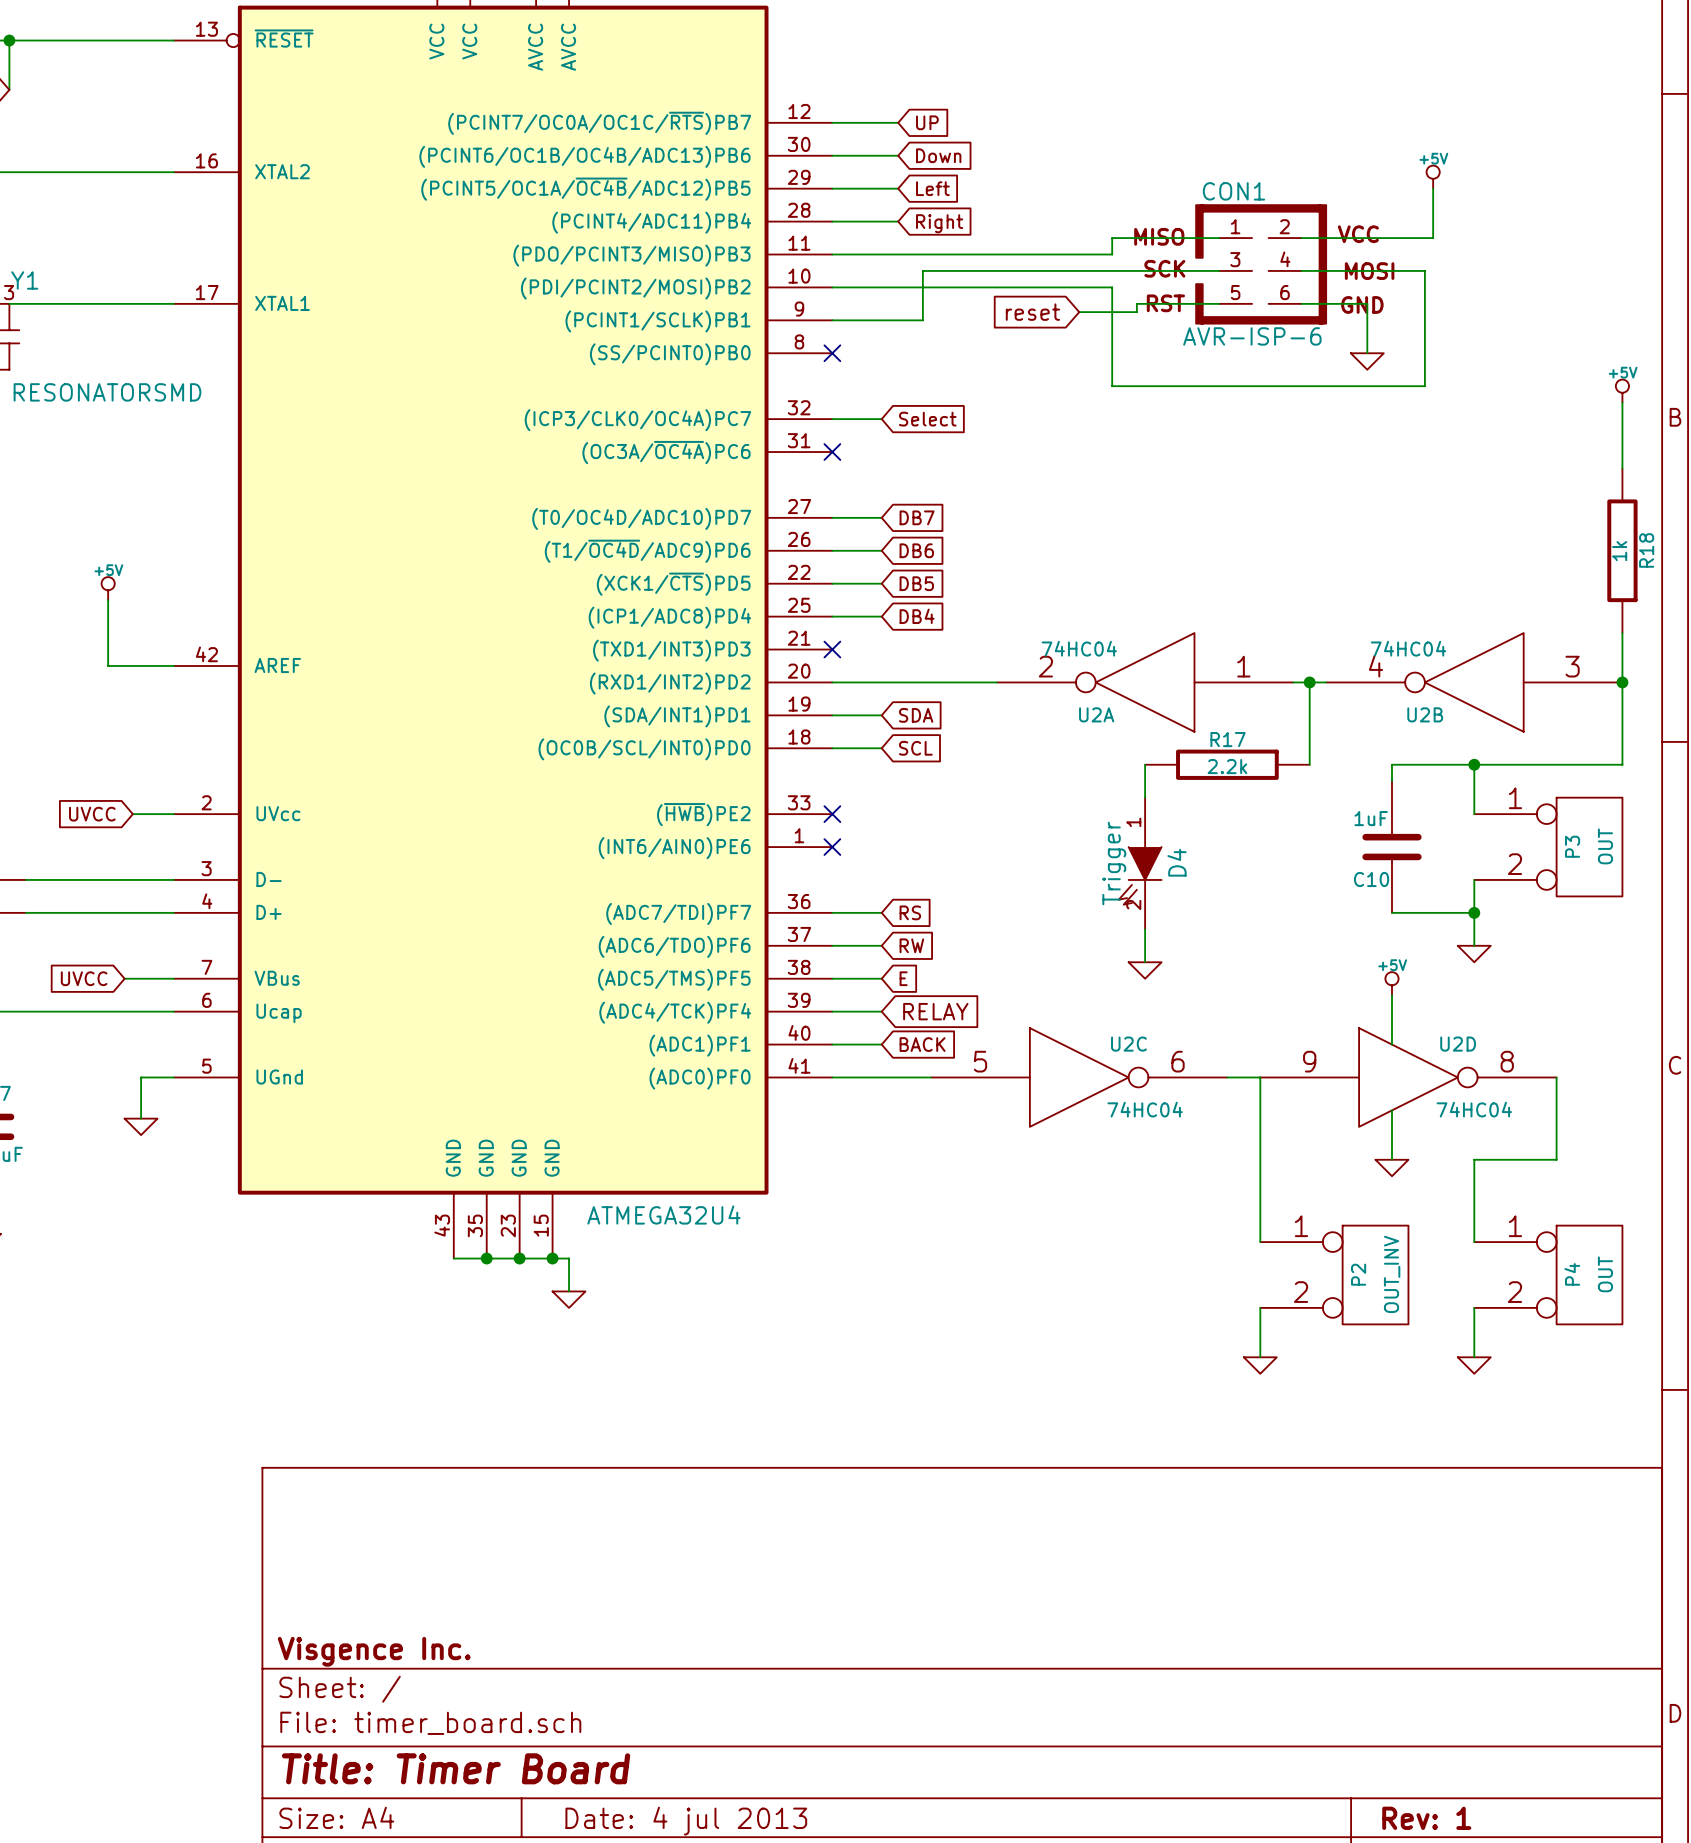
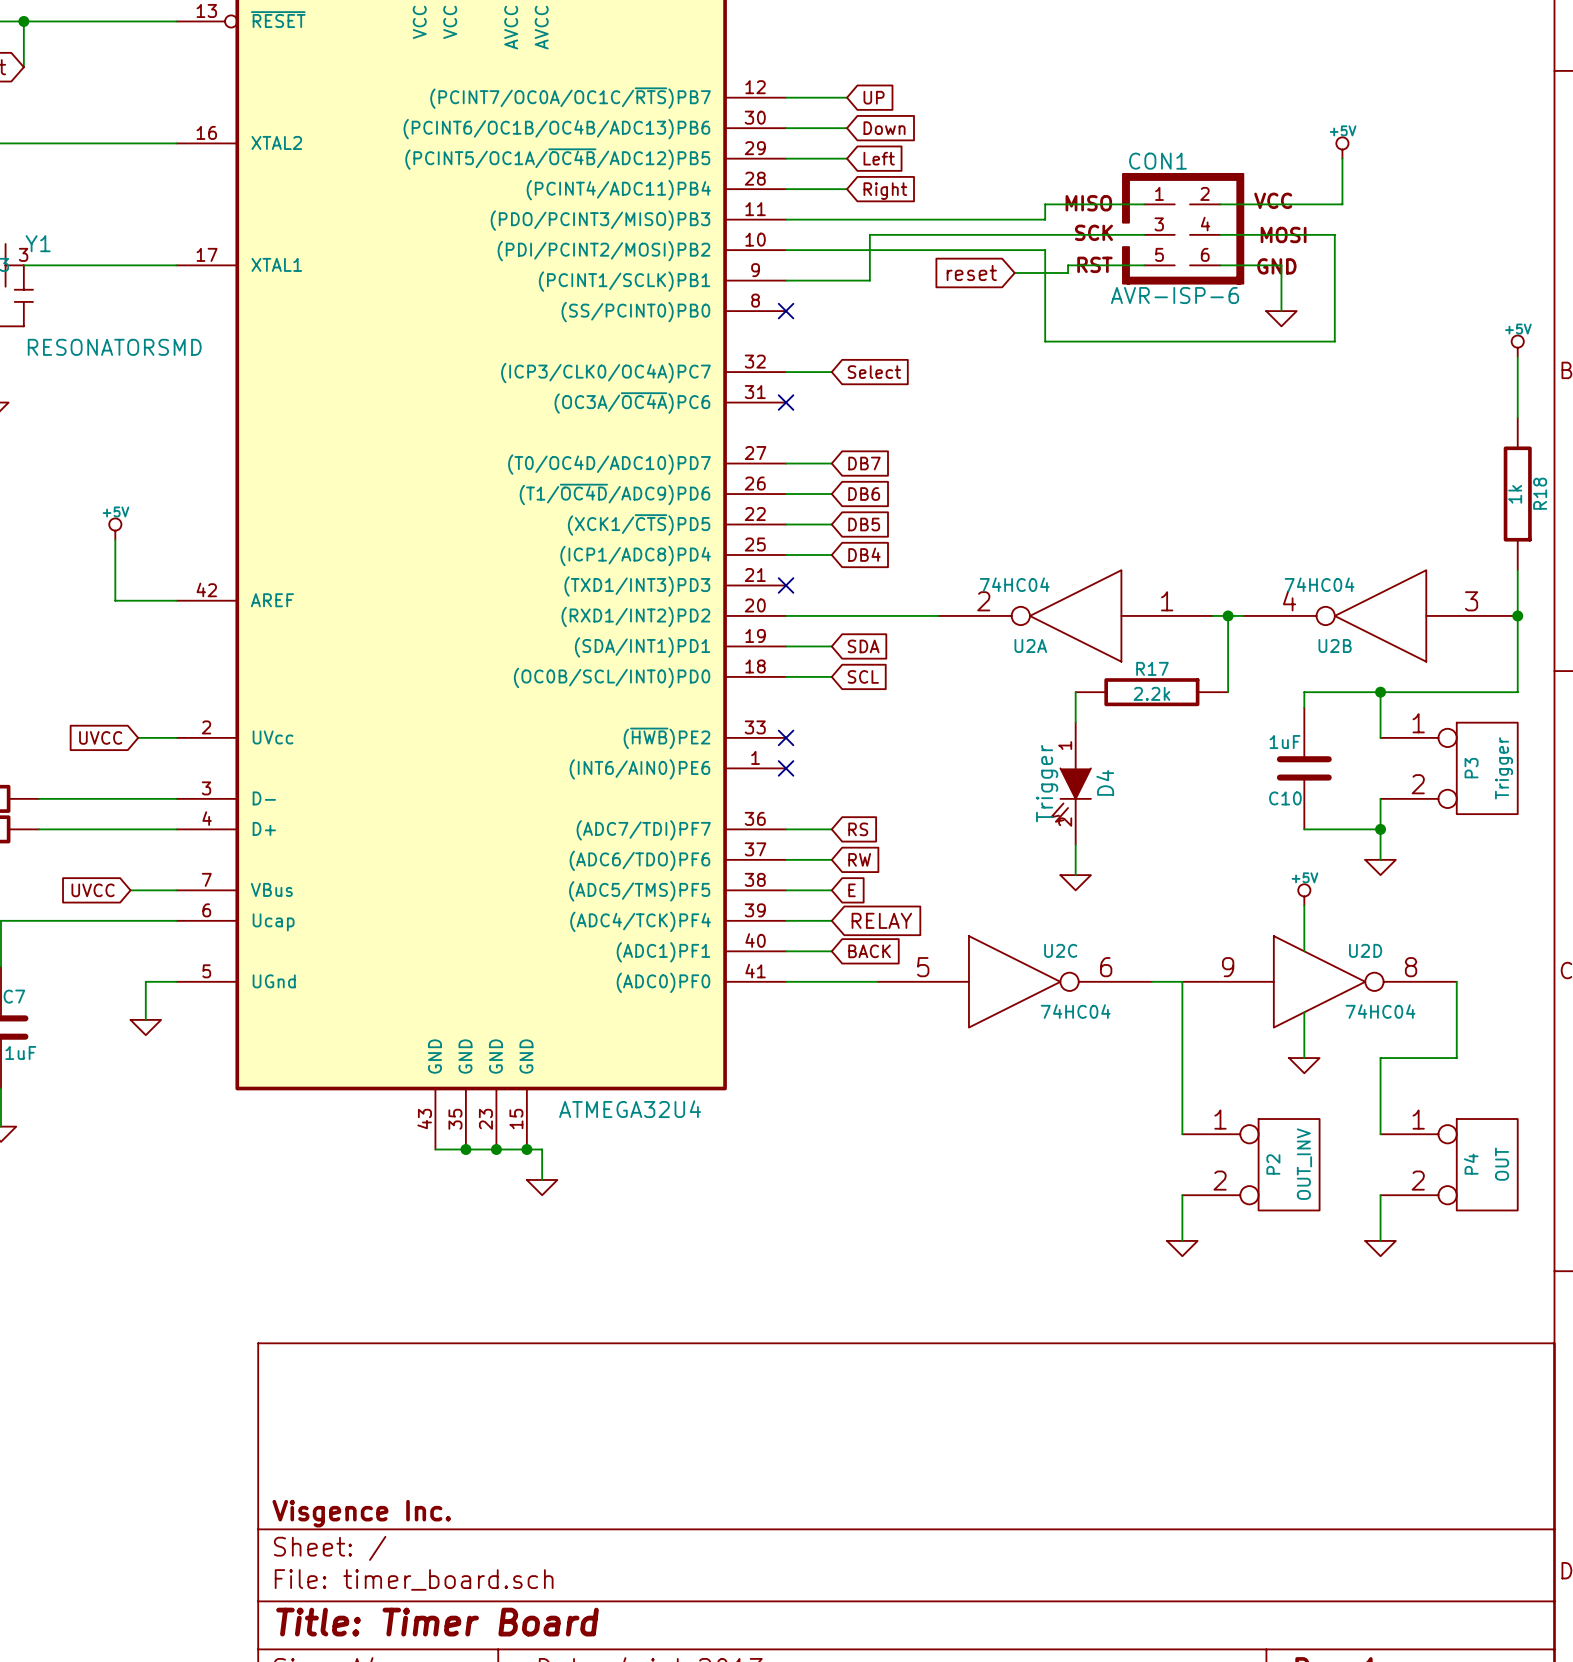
P3 value: OUT (1605, 846) -> Trigger (1504, 768)

